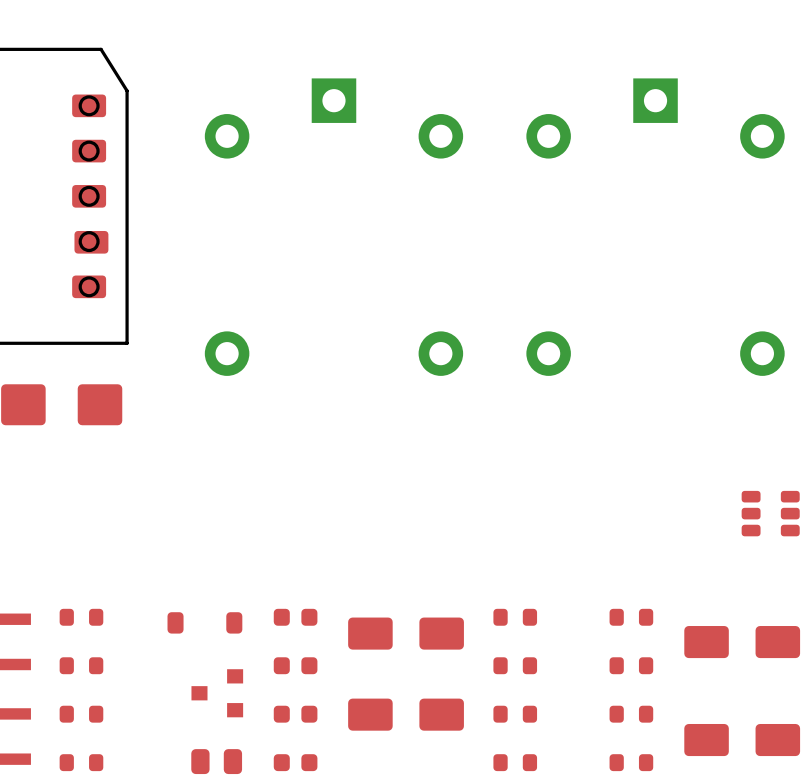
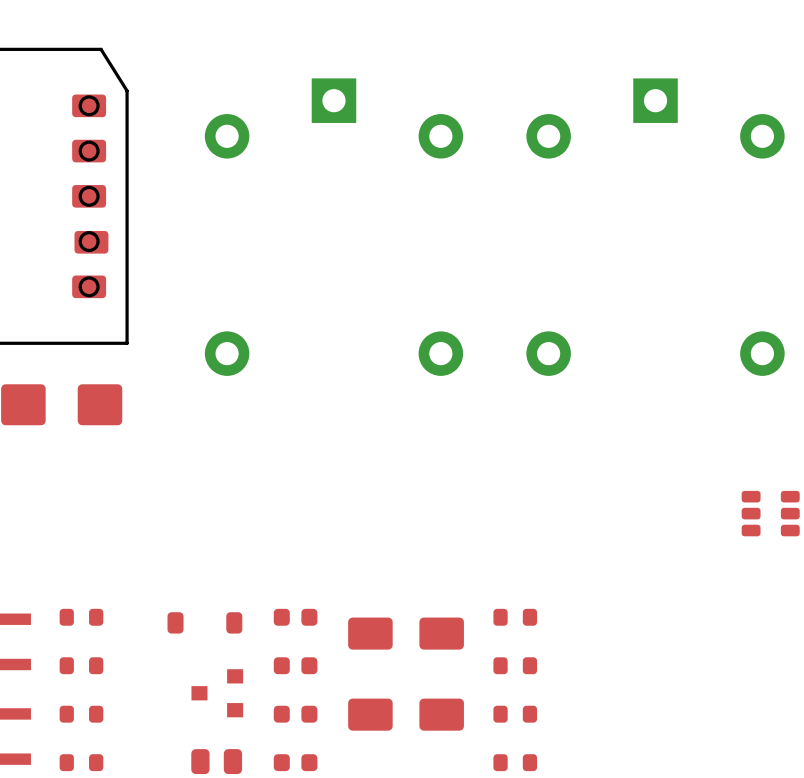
part: (631, 617) -> none
part: (742, 642) -> none
part: (631, 665) -> none
part: (631, 714) -> none
part: (742, 740) -> none
part: (631, 762) -> none

